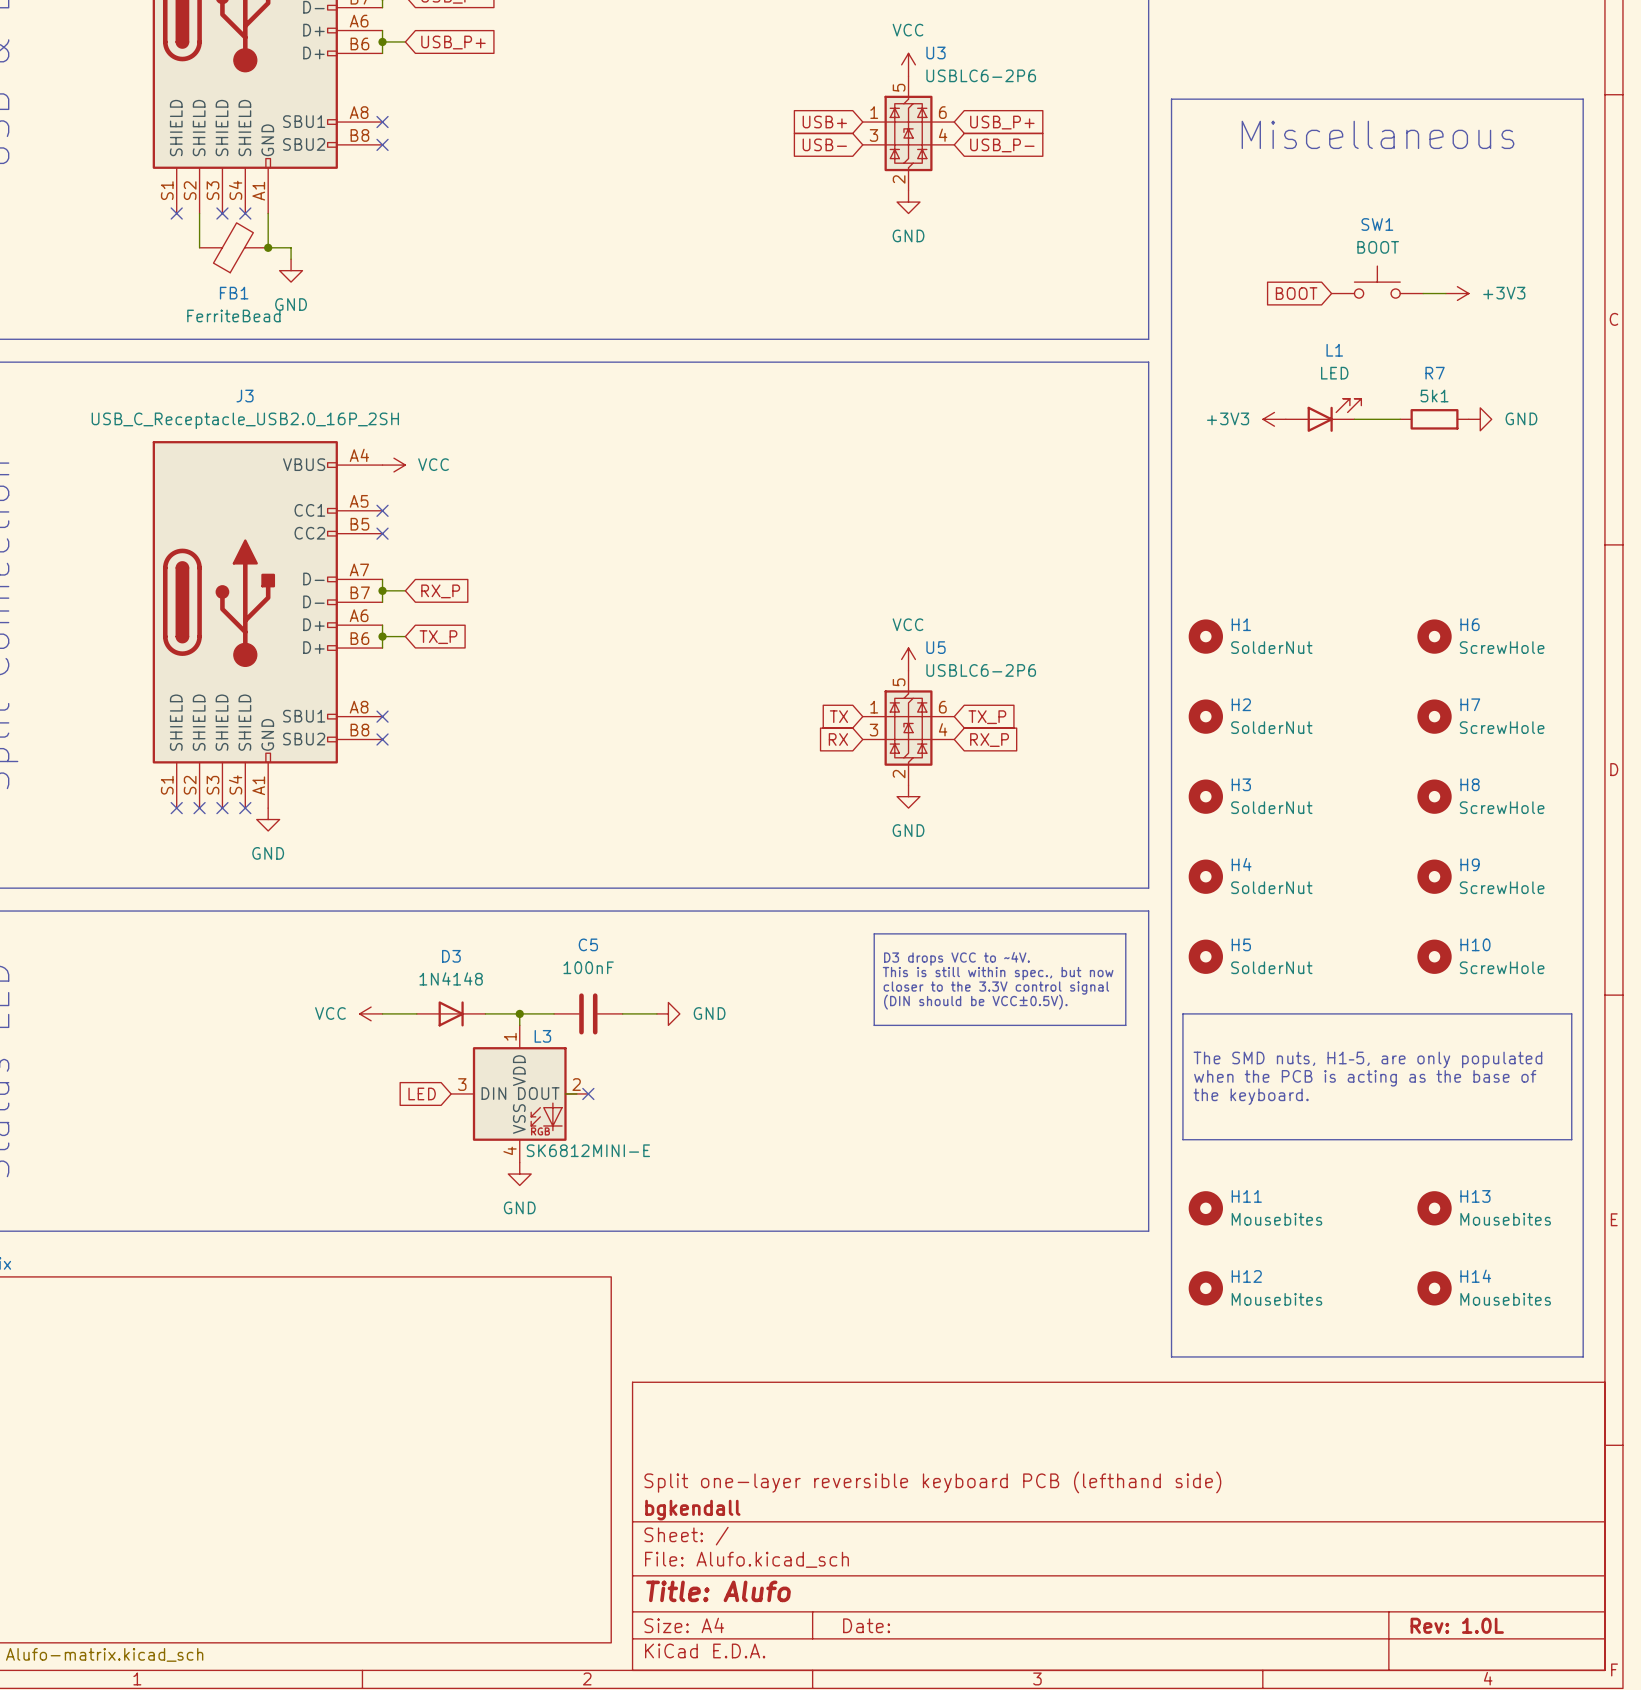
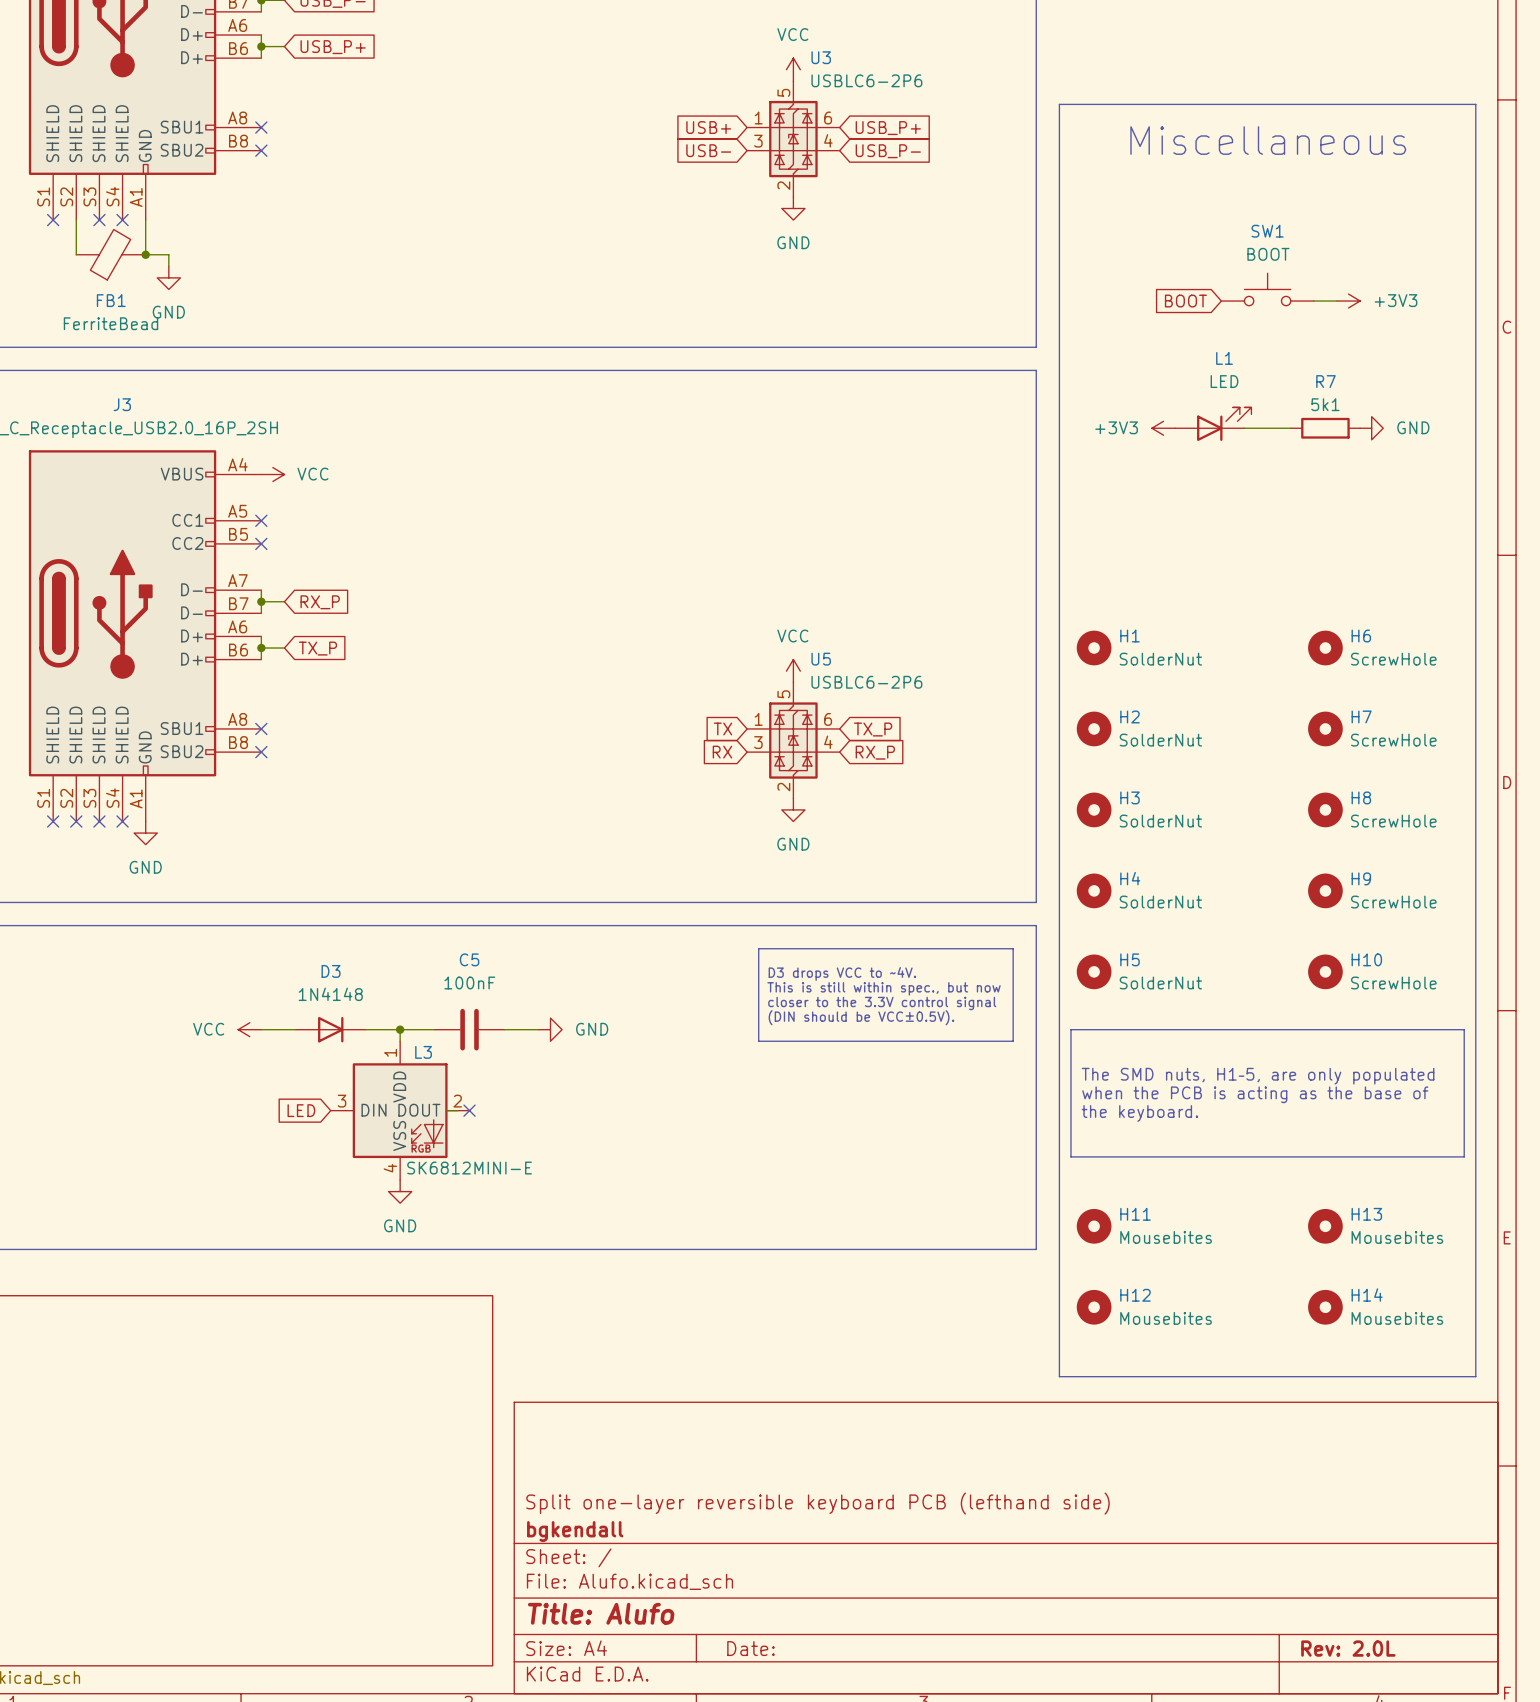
title block: Rev: 1.0L (1457, 1625) -> Rev: 2.0L (1348, 1648)

